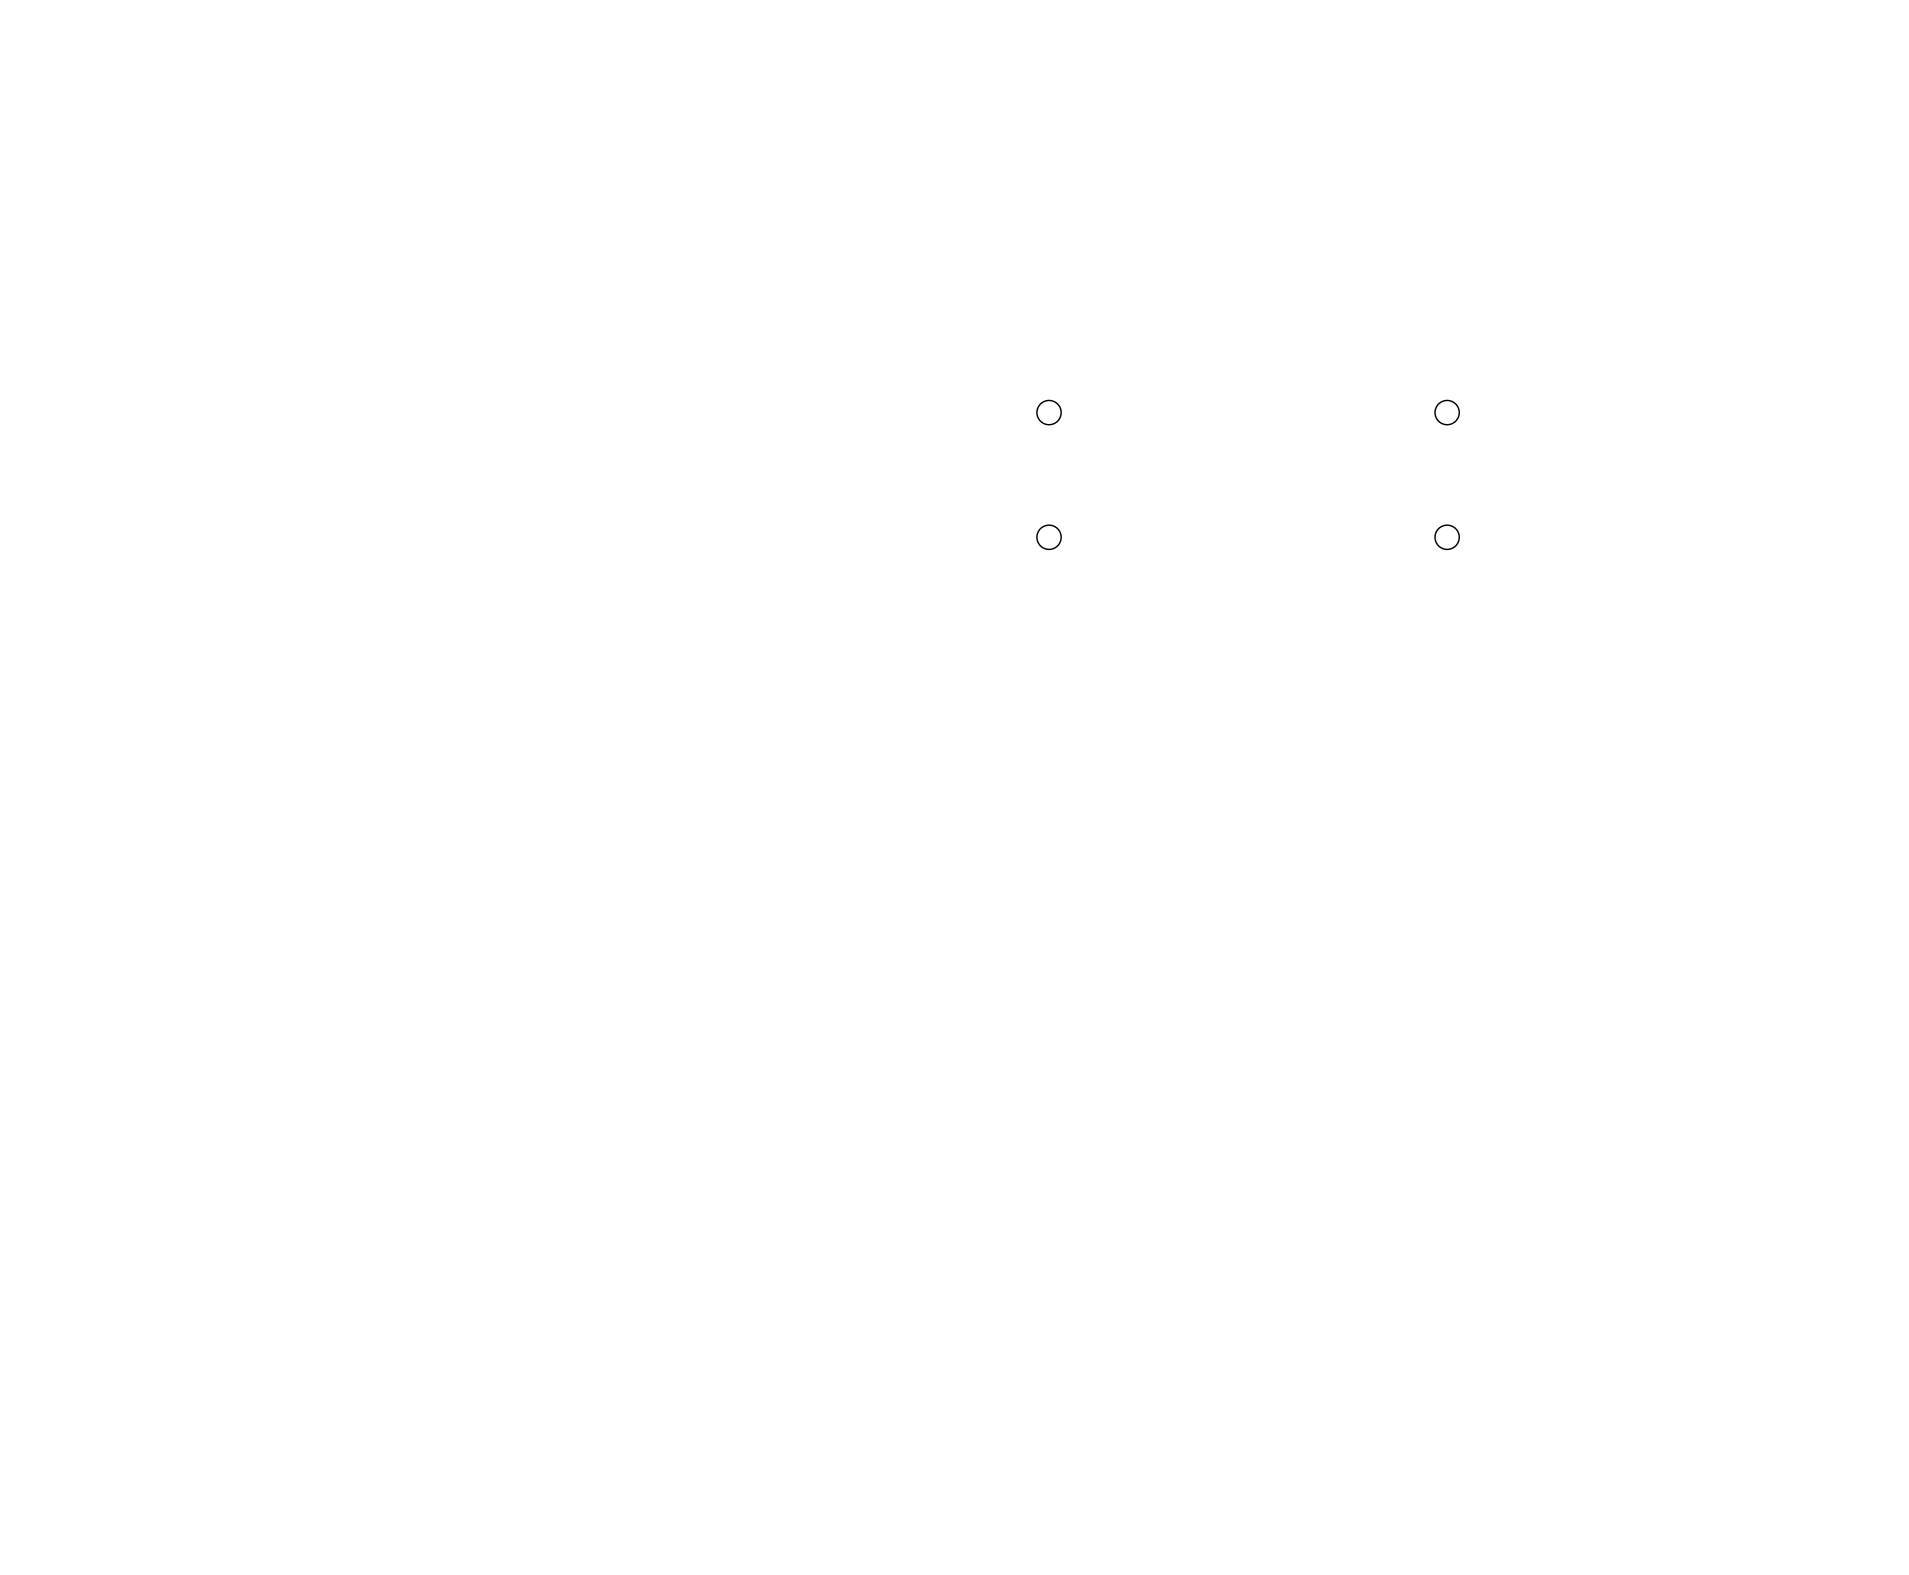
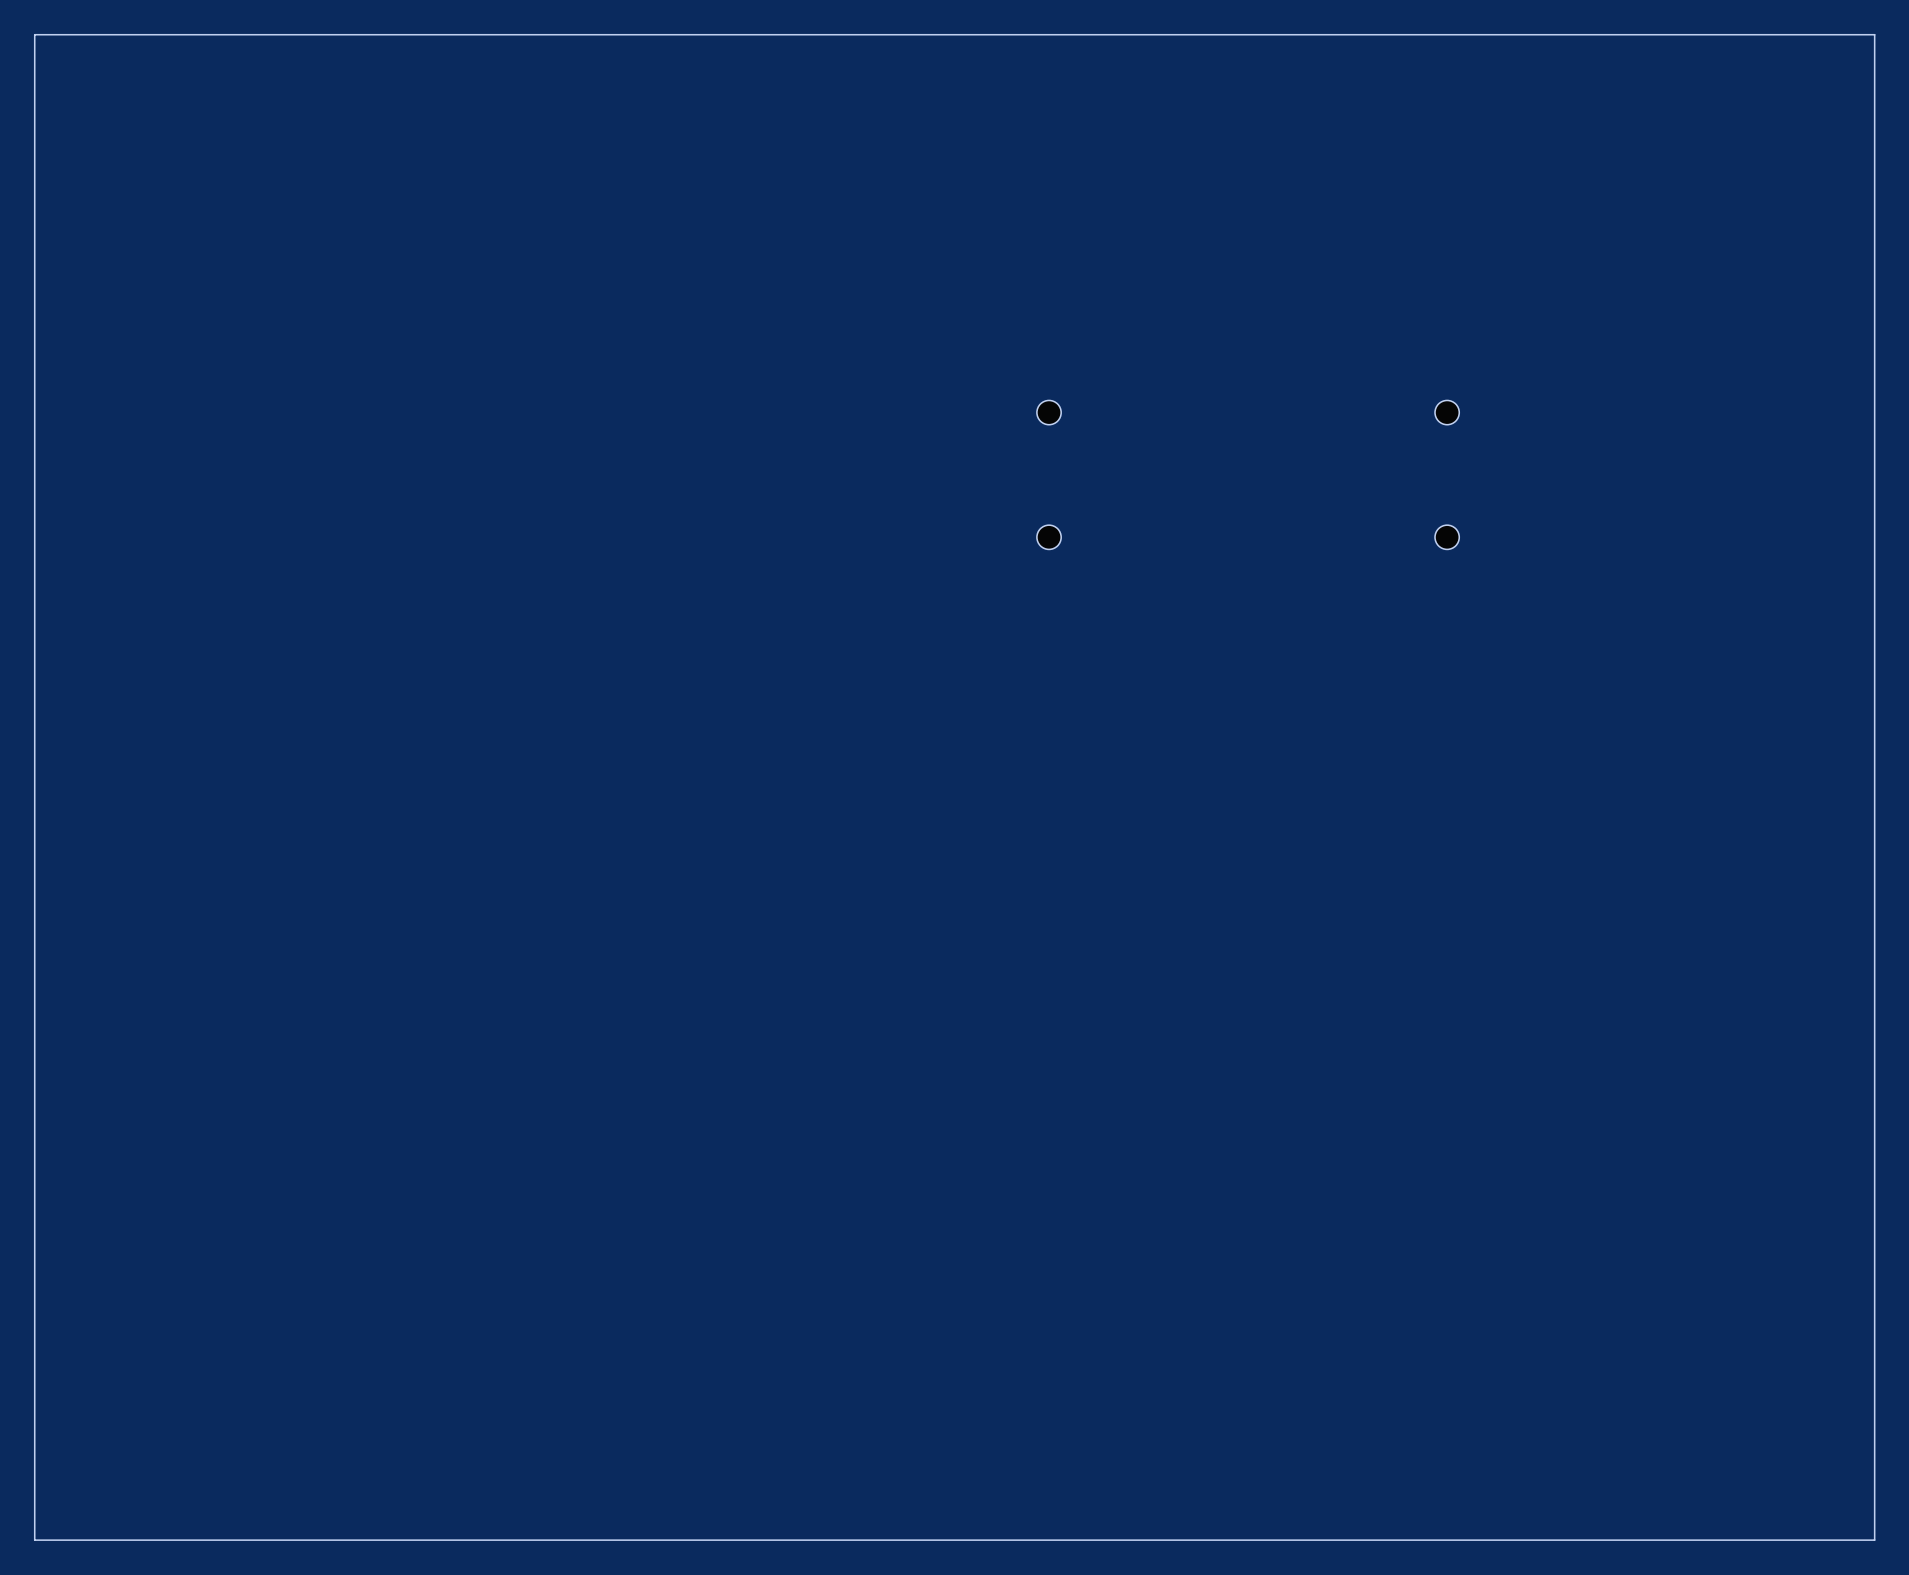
board edge: none -> (1874, 34) (34, 34) (34, 1540) (1874, 1540) (1874, 34)

